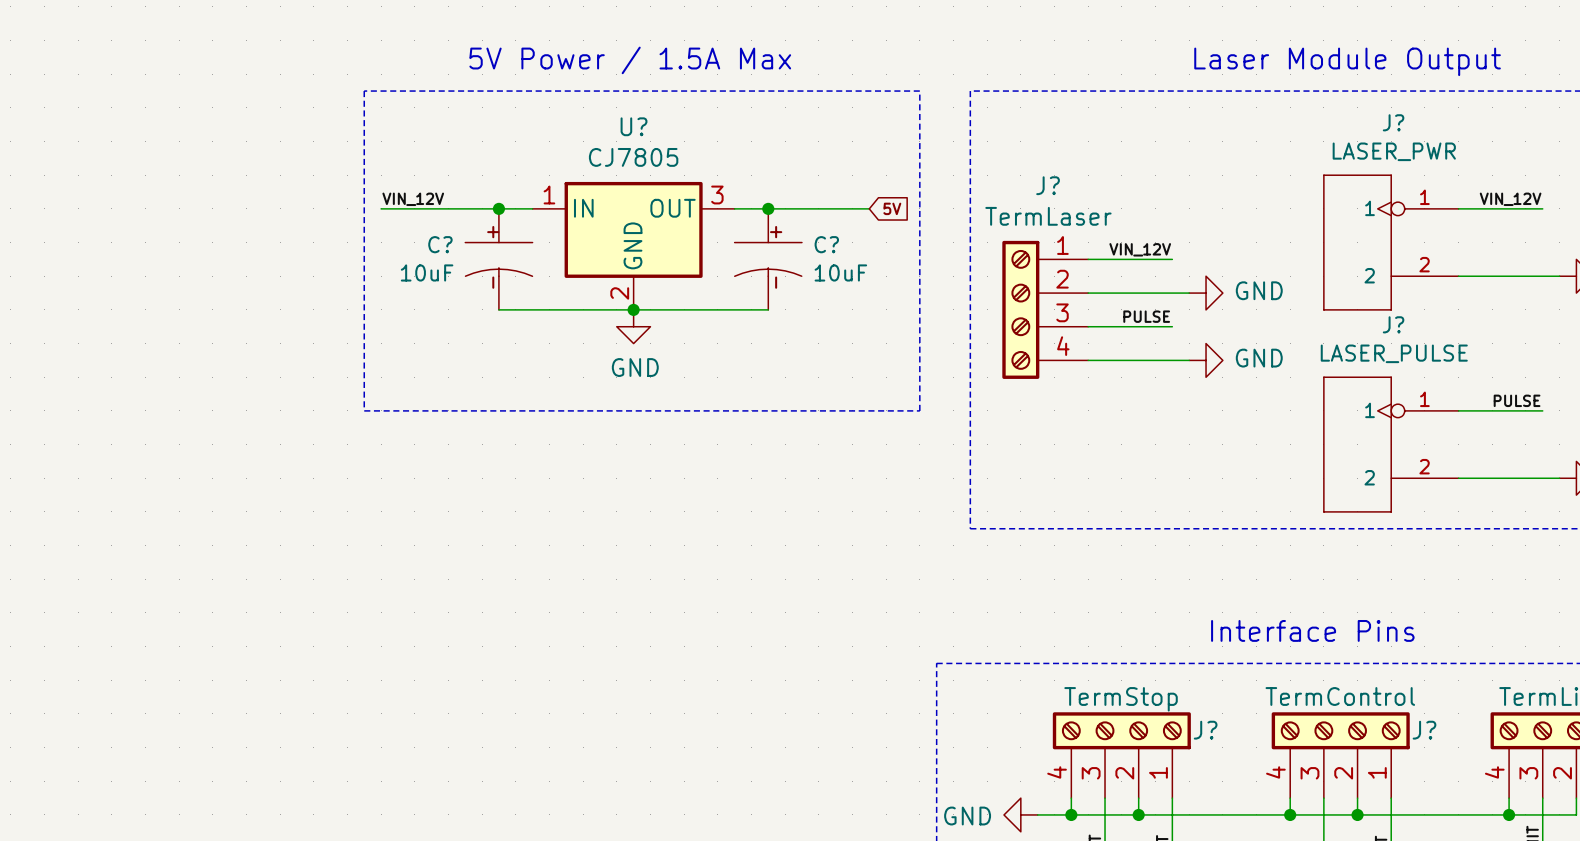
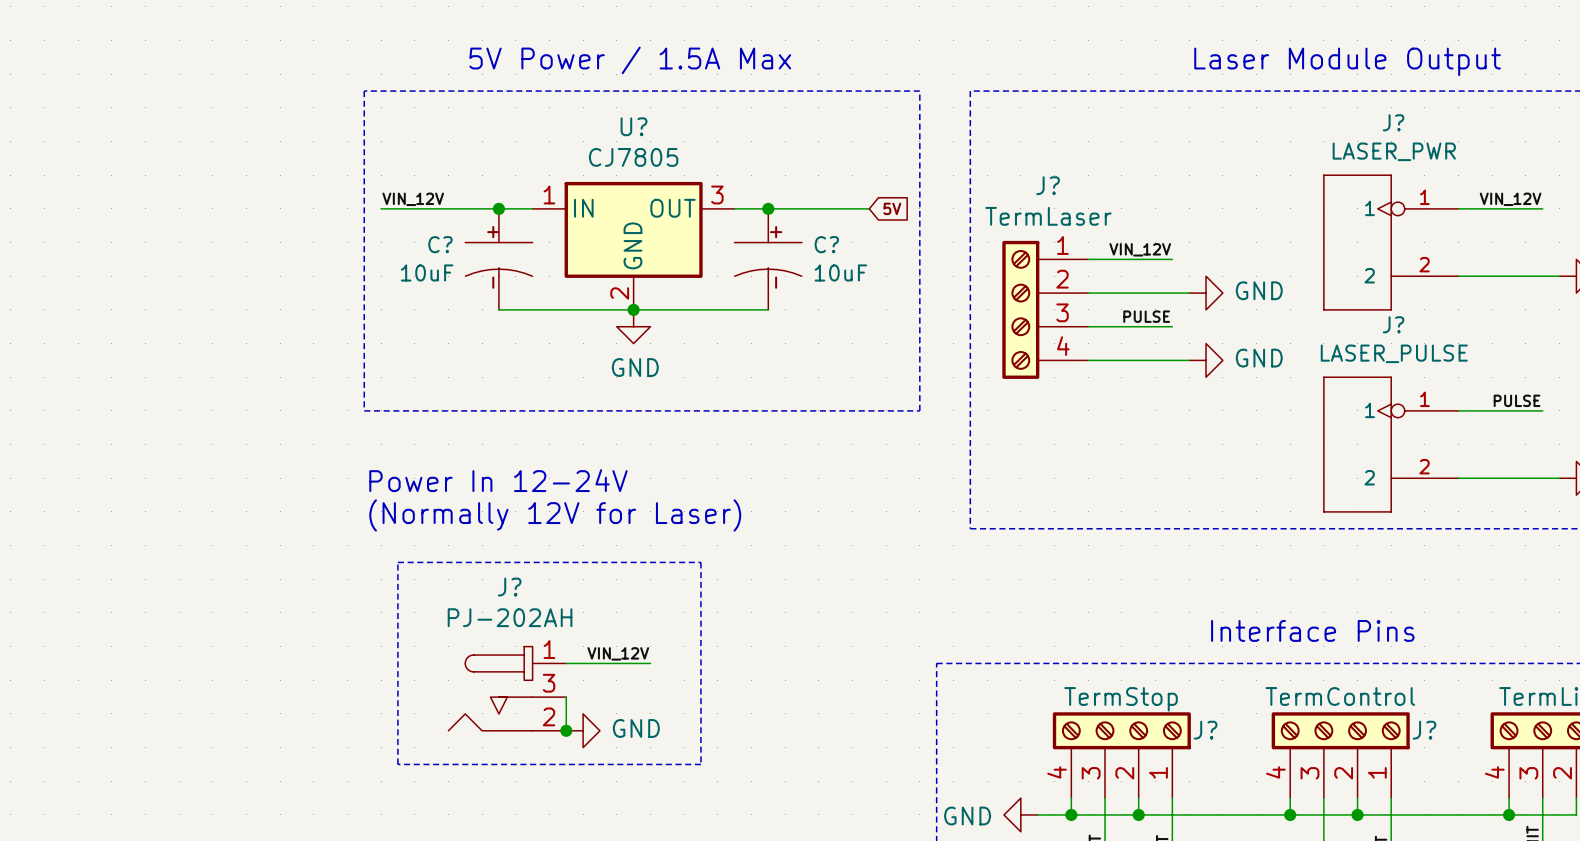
text: none -> Power In 12-24V (498, 480)
text: none -> (Normally 12V for Laser) (555, 515)
line: none -> (397, 562) (700, 562) (700, 764) (397, 764) (397, 562)
label: none -> VIN_12V (618, 653)
wire: none -> (566, 663) (650, 663)
J?: none -> PJ-202AH (507, 688)
wire: none -> (566, 697) (566, 730)
junction: none -> (566, 730)
power symbol: none -> GND (583, 730)

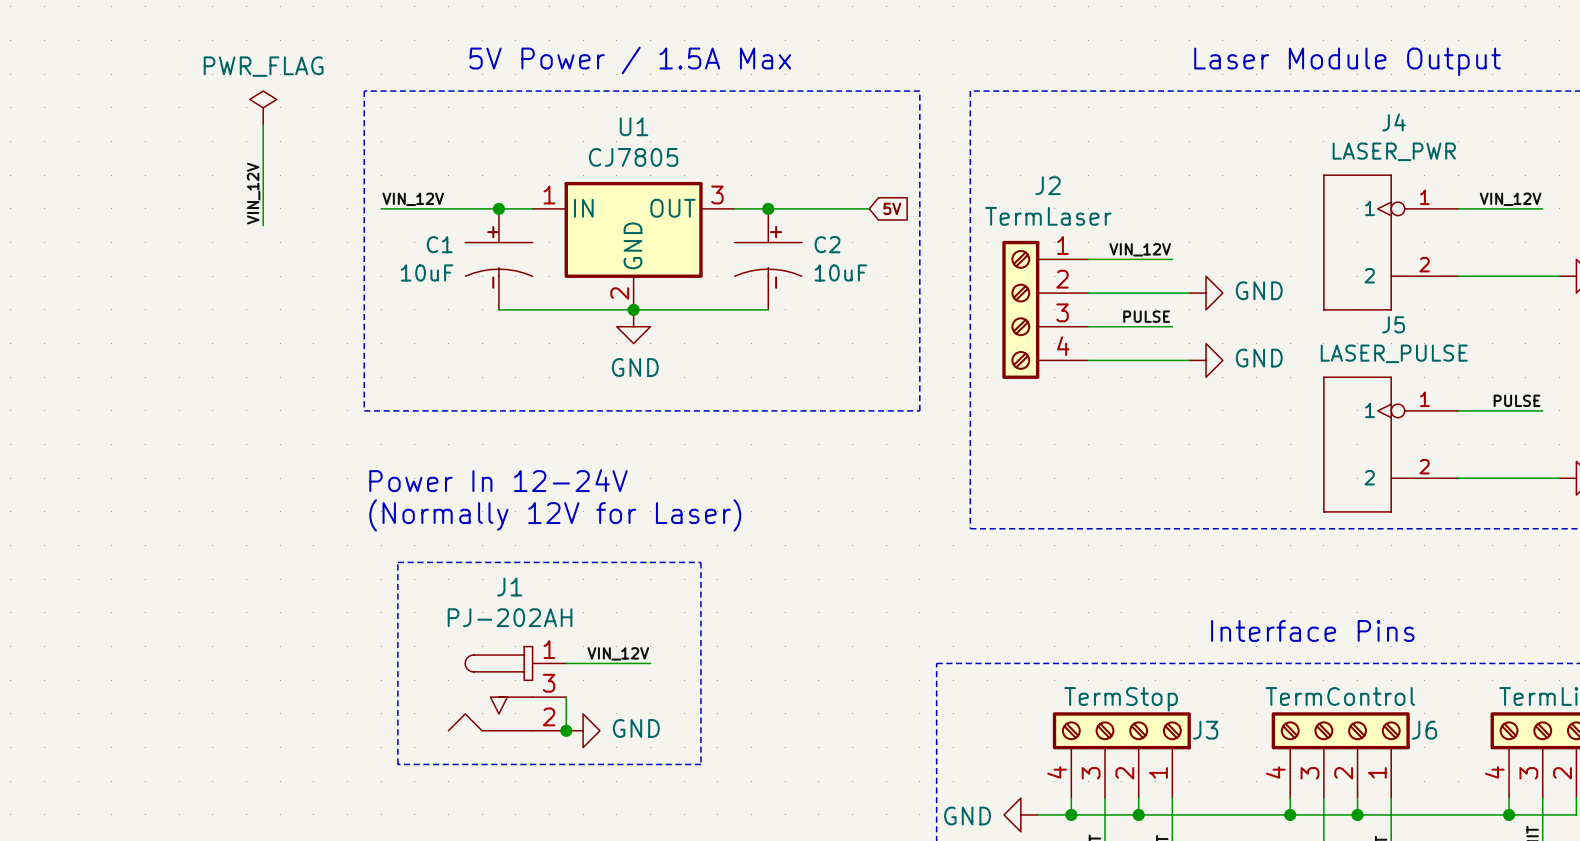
power symbol: none -> PWR_FLAG (263, 107)
J? name: J? (1393, 122) -> J4 (1393, 122)
wire: none -> (263, 124) (263, 225)
U? name: U? (634, 126) -> U1 (634, 126)
J? name: J? (1048, 185) -> J2 (1048, 185)
label: none -> VIN_12V (253, 193)
C? name: C? (440, 244) -> C1 (439, 244)
C? name: C? (826, 244) -> C2 (827, 244)
J? name: J? (1393, 324) -> J5 (1393, 324)
J? name: J? (509, 587) -> J1 (509, 587)
J? name: J? (1205, 730) -> J3 (1205, 730)
J? name: J? (1424, 730) -> J6 (1424, 730)

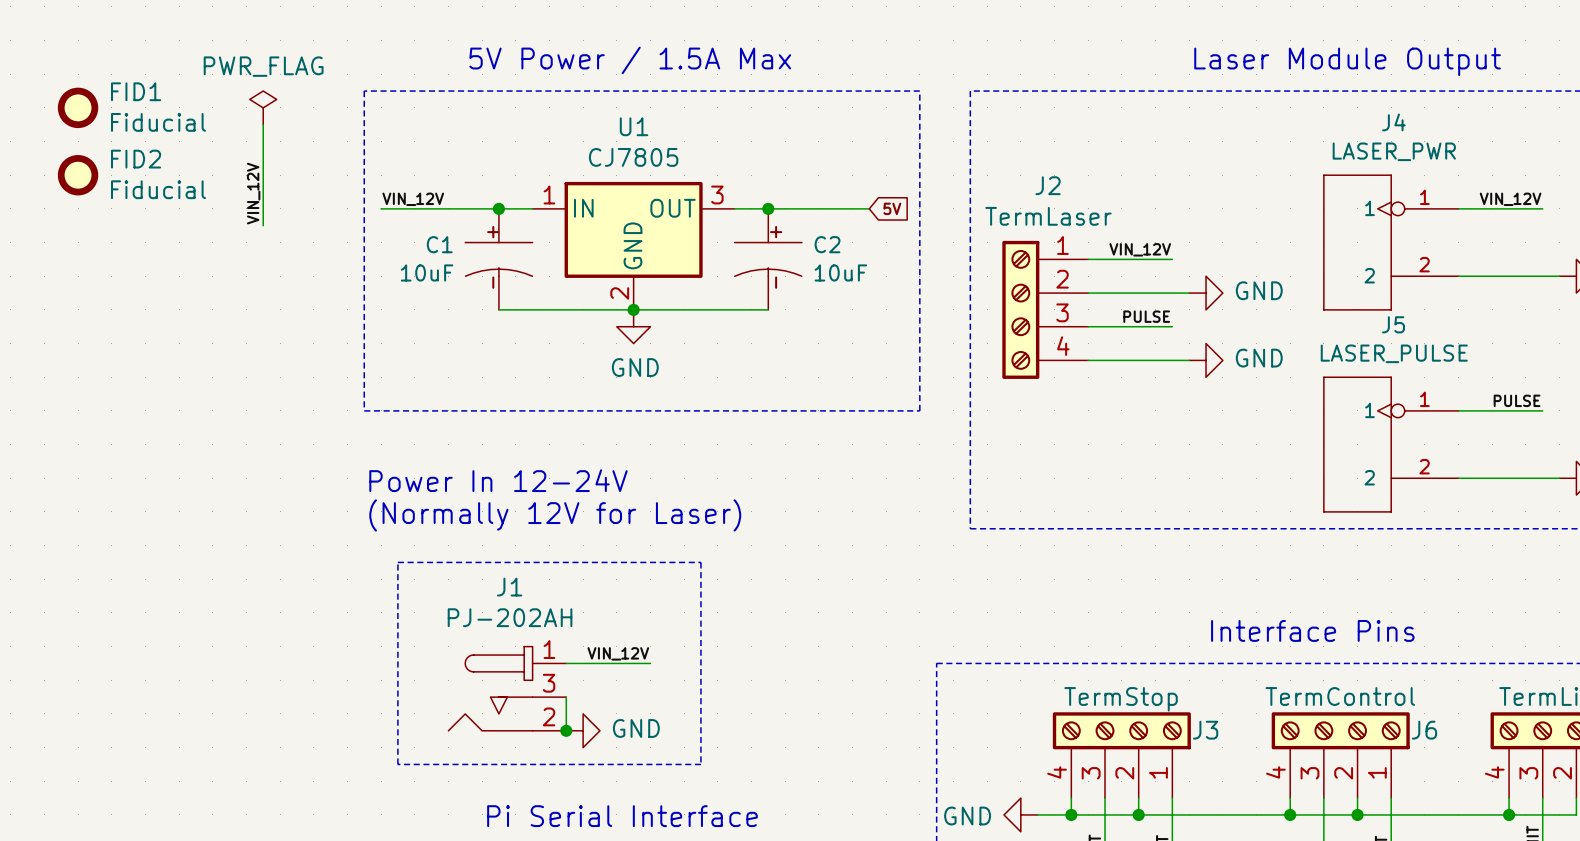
FID1: none -> Fiducial (78, 107)
FID2: none -> Fiducial (78, 175)
text: none -> Pi Serial Interface (622, 816)

